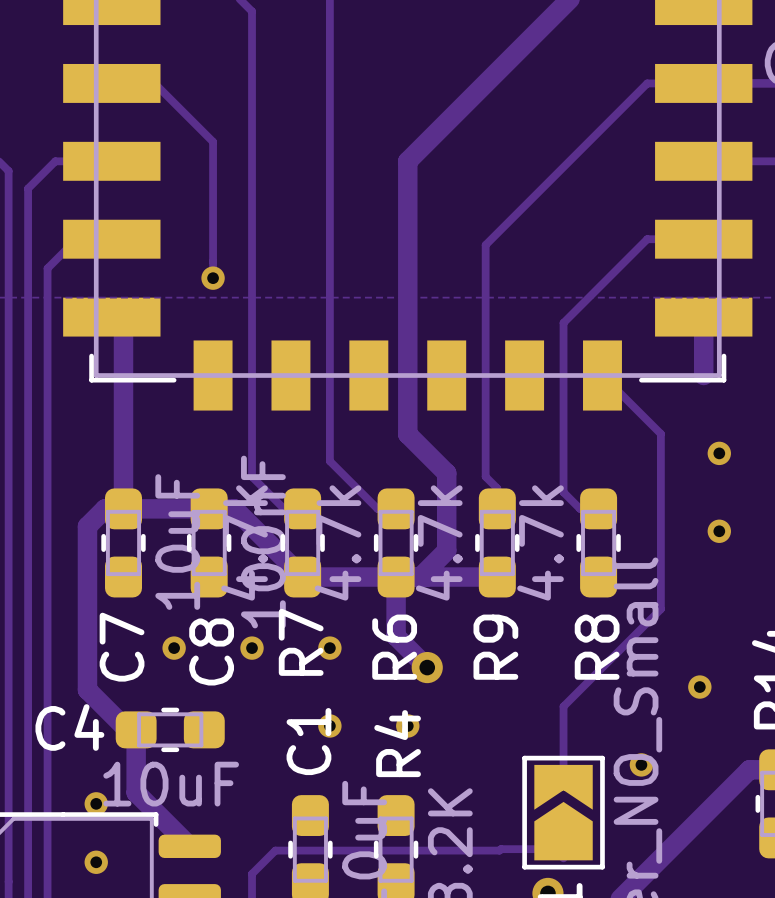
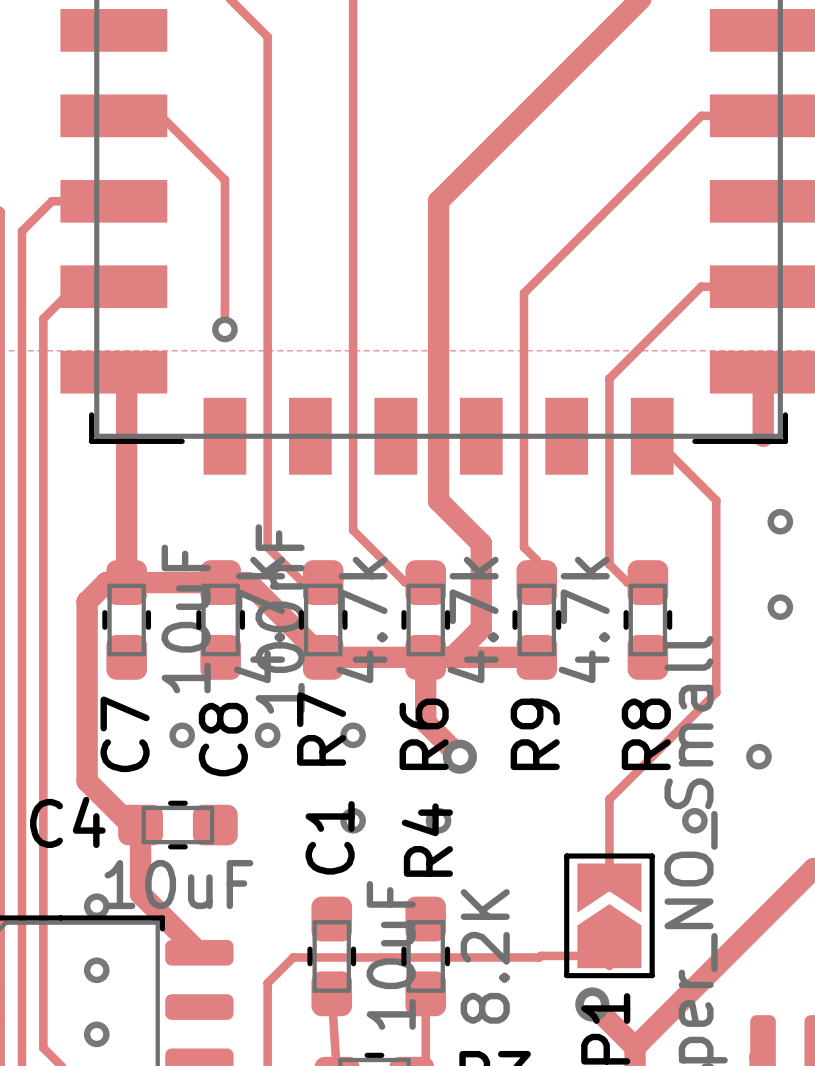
via position: (699, 687) -> (758, 756)
via: none -> (694, 820)
via: (641, 764) -> none

